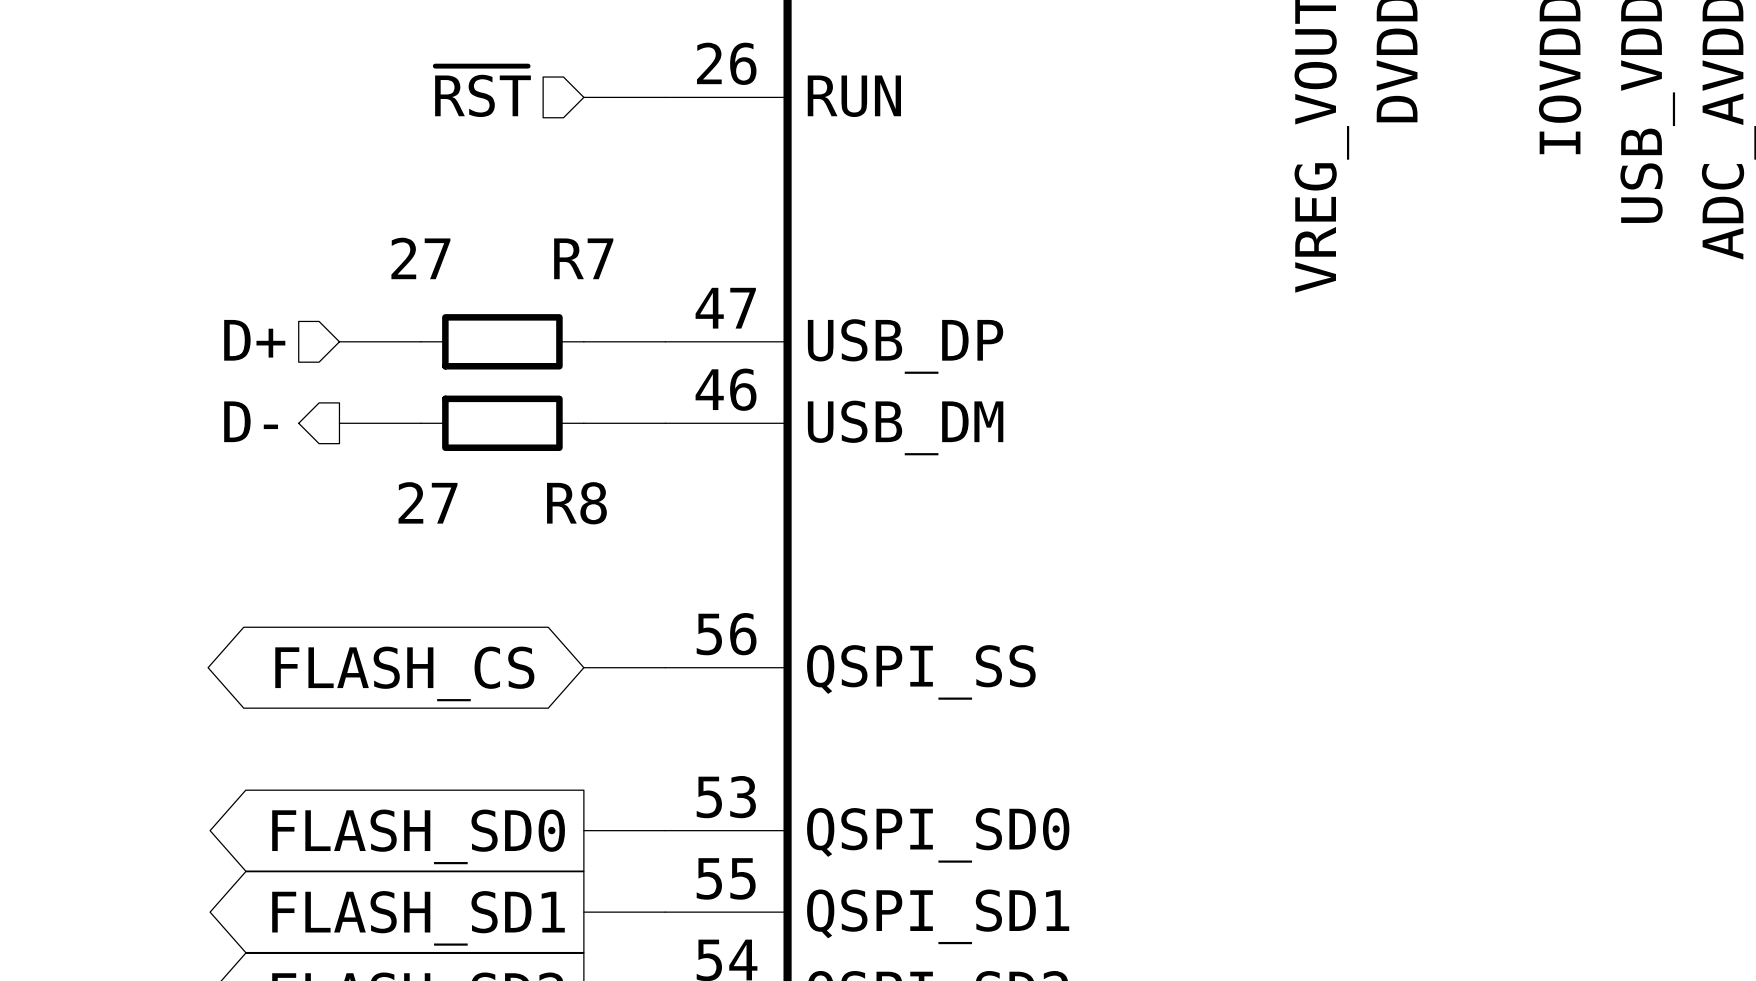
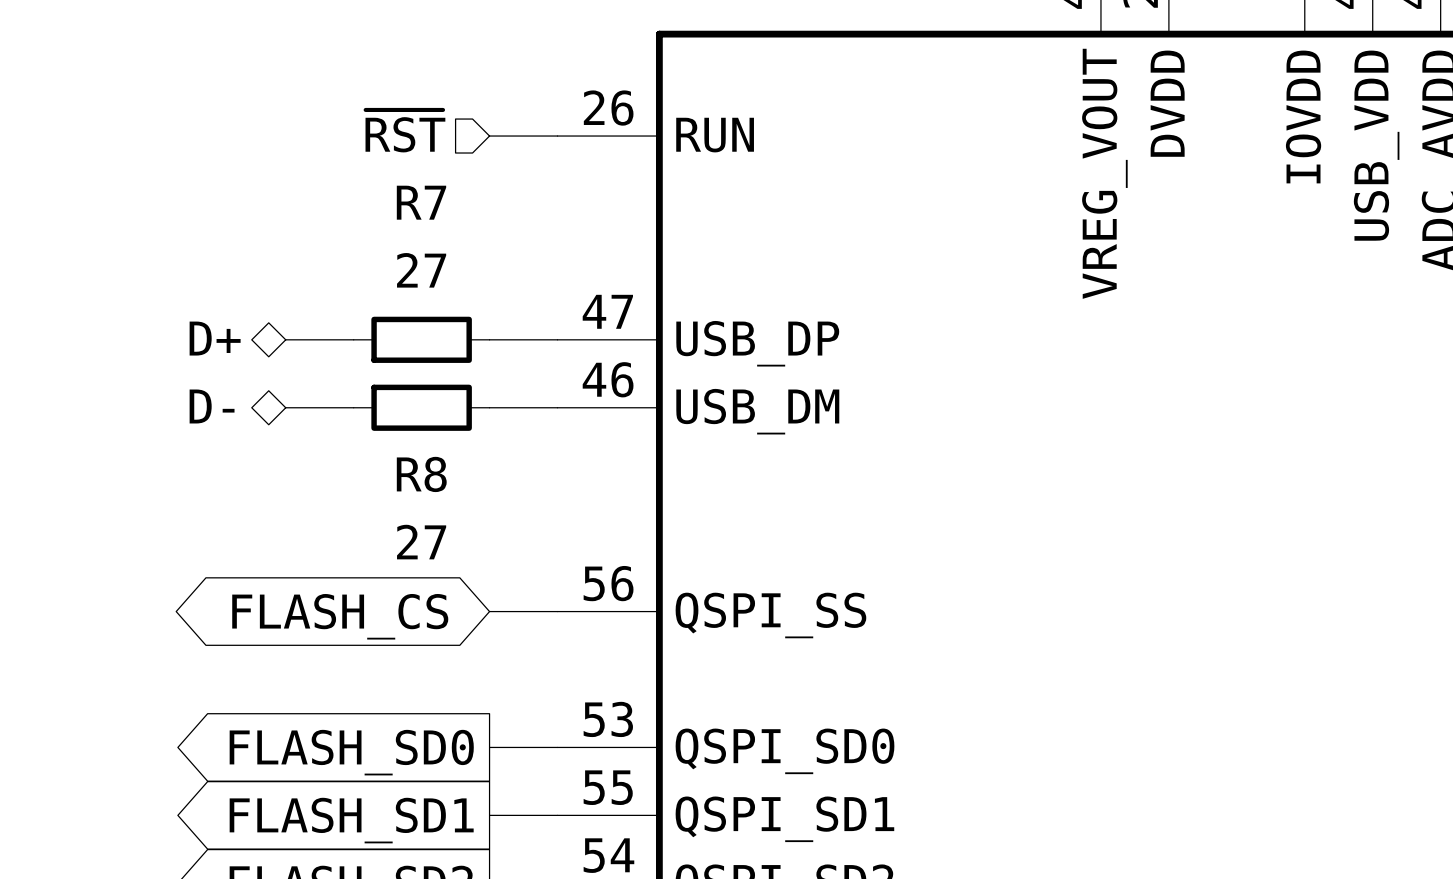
R7 value position: 27 (420, 258) -> 27 (421, 270)
R7 name position: R7 (583, 258) -> R7 (421, 202)
hierarchical label shape: input (254, 340) -> bidirectional (215, 338)
hierarchical label shape: output (251, 421) -> bidirectional (212, 406)
R8 value position: 27 (428, 502) -> 27 (421, 542)
R8 name position: R8 (576, 503) -> R8 (421, 474)

